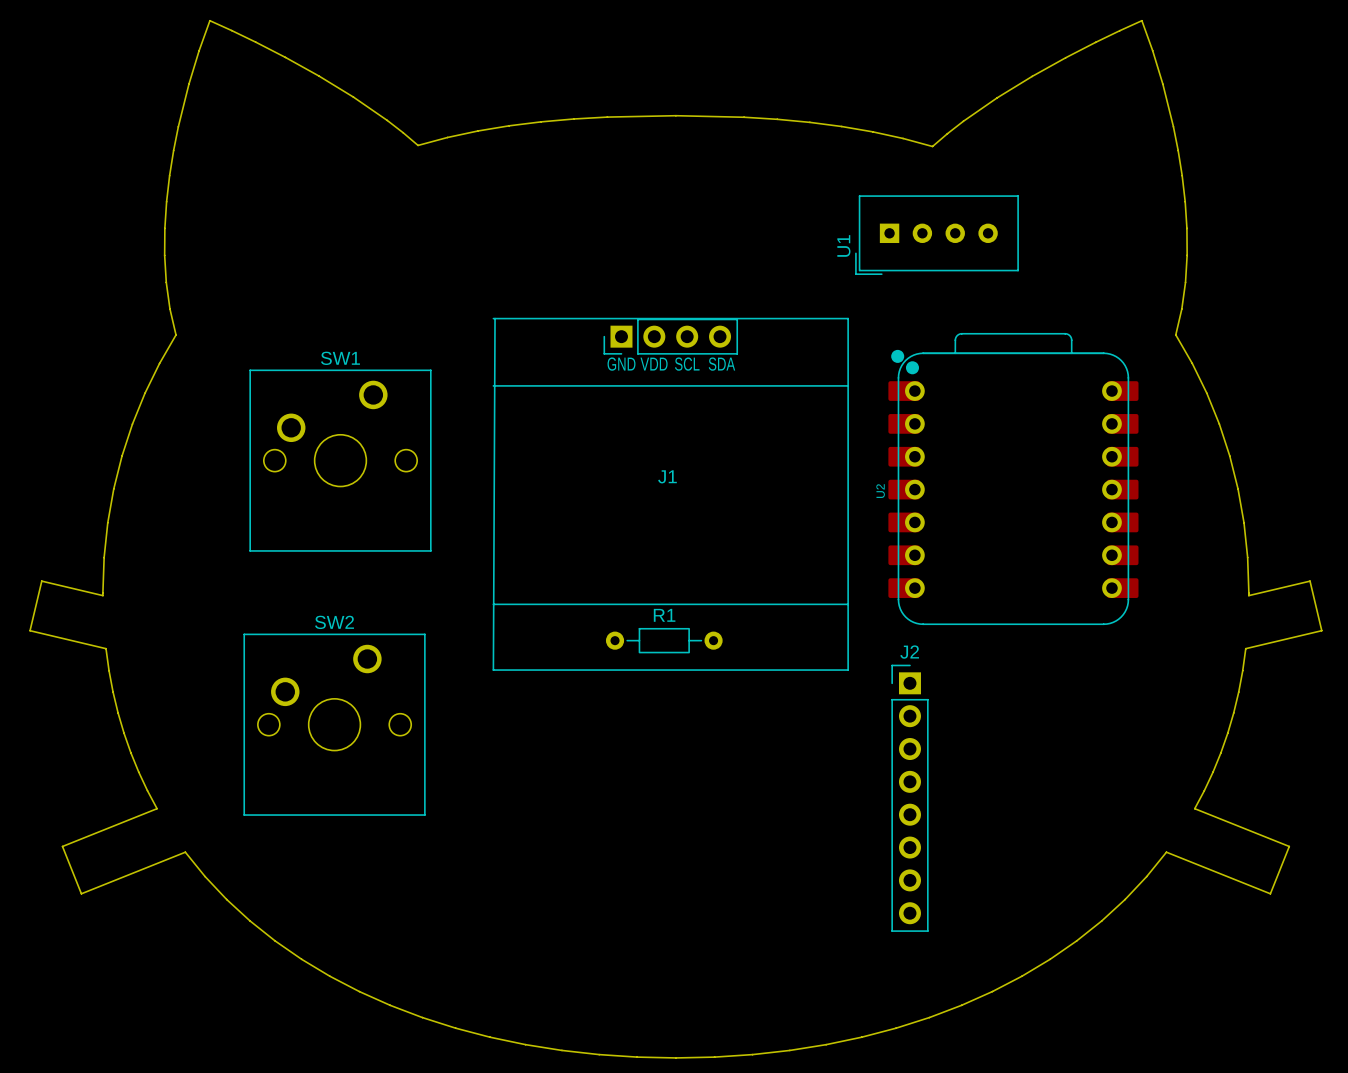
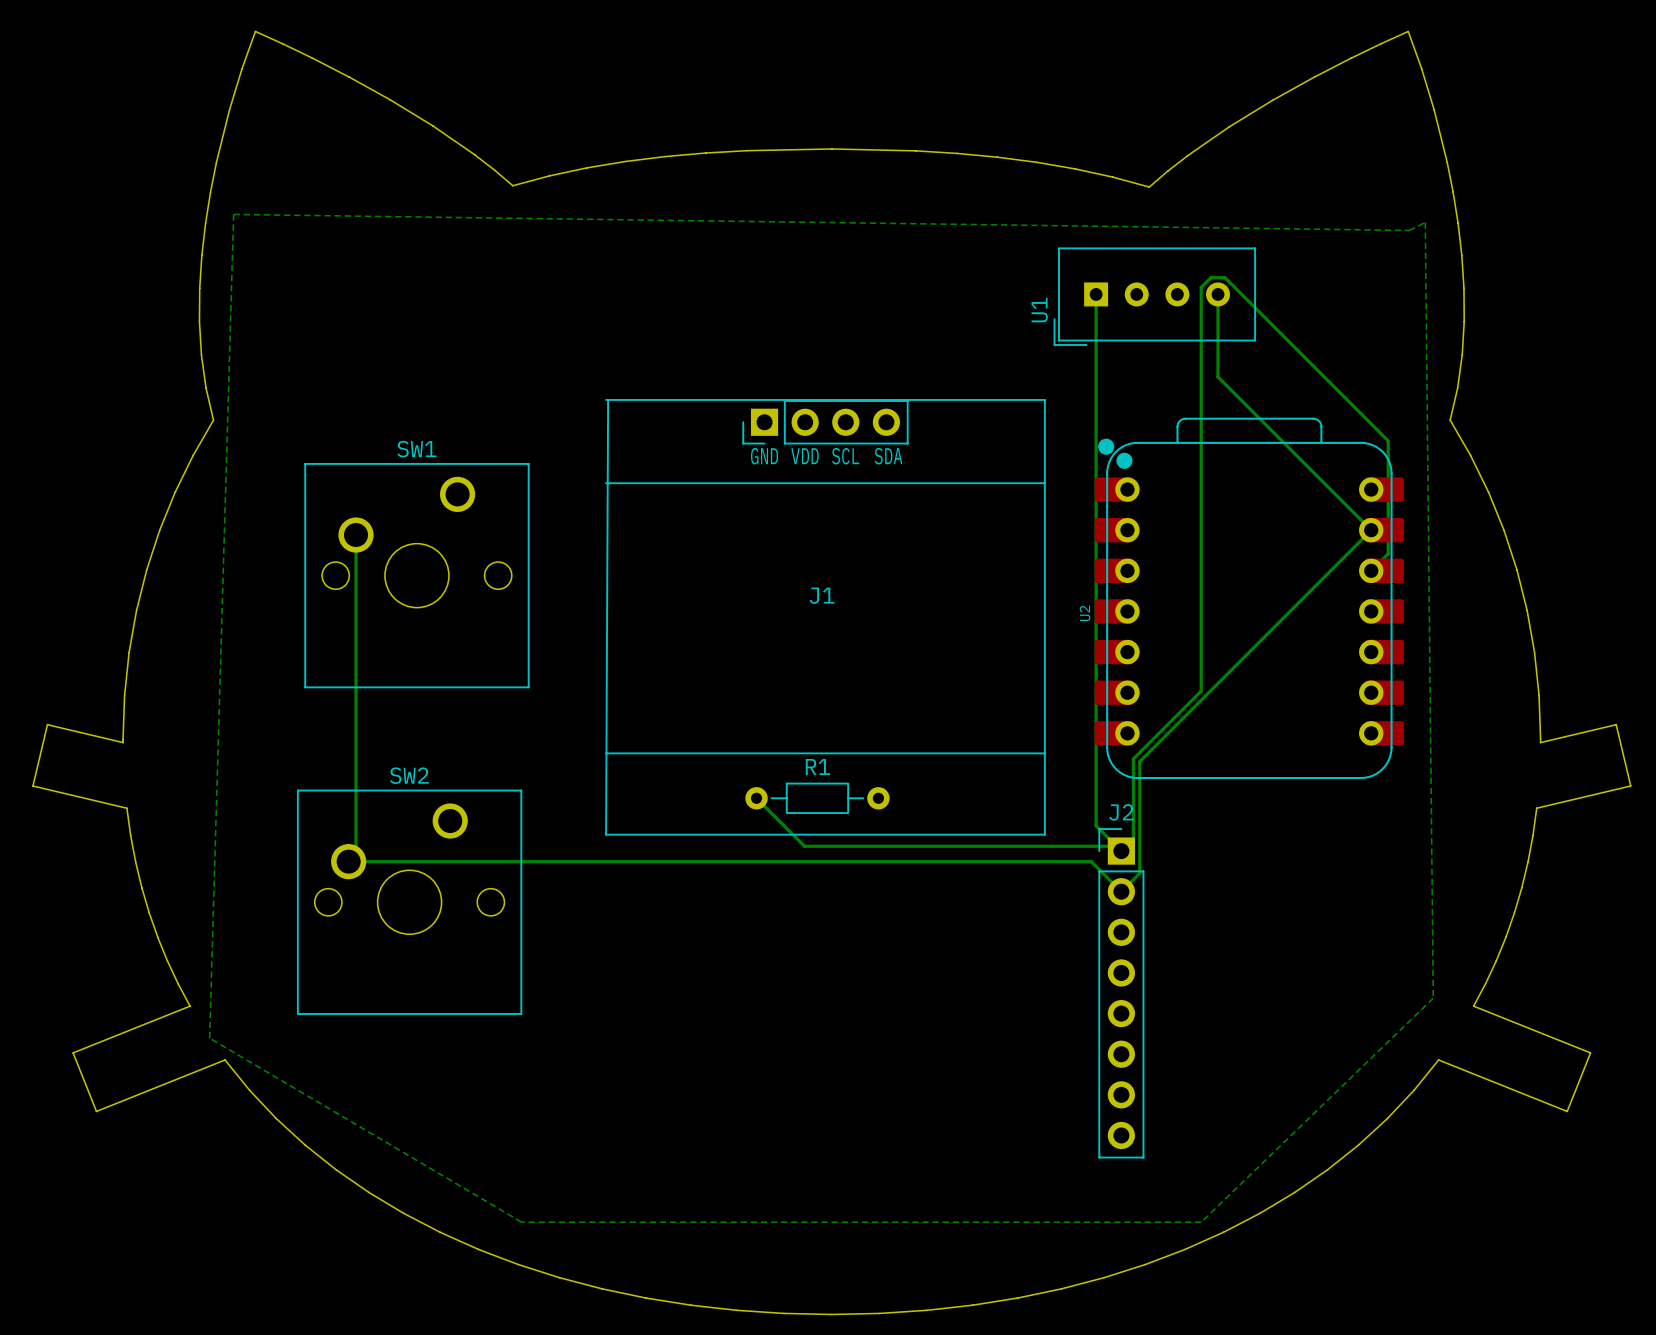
bottom zone outline: none -> (233, 214) (209, 1038) (521, 1222) (1201, 1222) (1433, 998) (1425, 222) (1409, 230) (233, 214)
bottom track: none -> (1096, 294) (1096, 825) (1121, 851)
bottom track: none -> (1218, 294) (1218, 376) (1371, 530) (1139, 761) (1139, 873) (1121, 891) (1091, 861) (348, 861) (356, 854) (356, 535)
bottom track: none -> (1371, 570) (1388, 553) (1388, 440) (1224, 277) (1211, 277) (1201, 287) (1201, 691) (1133, 758) (1133, 846) (804, 846) (756, 798)

